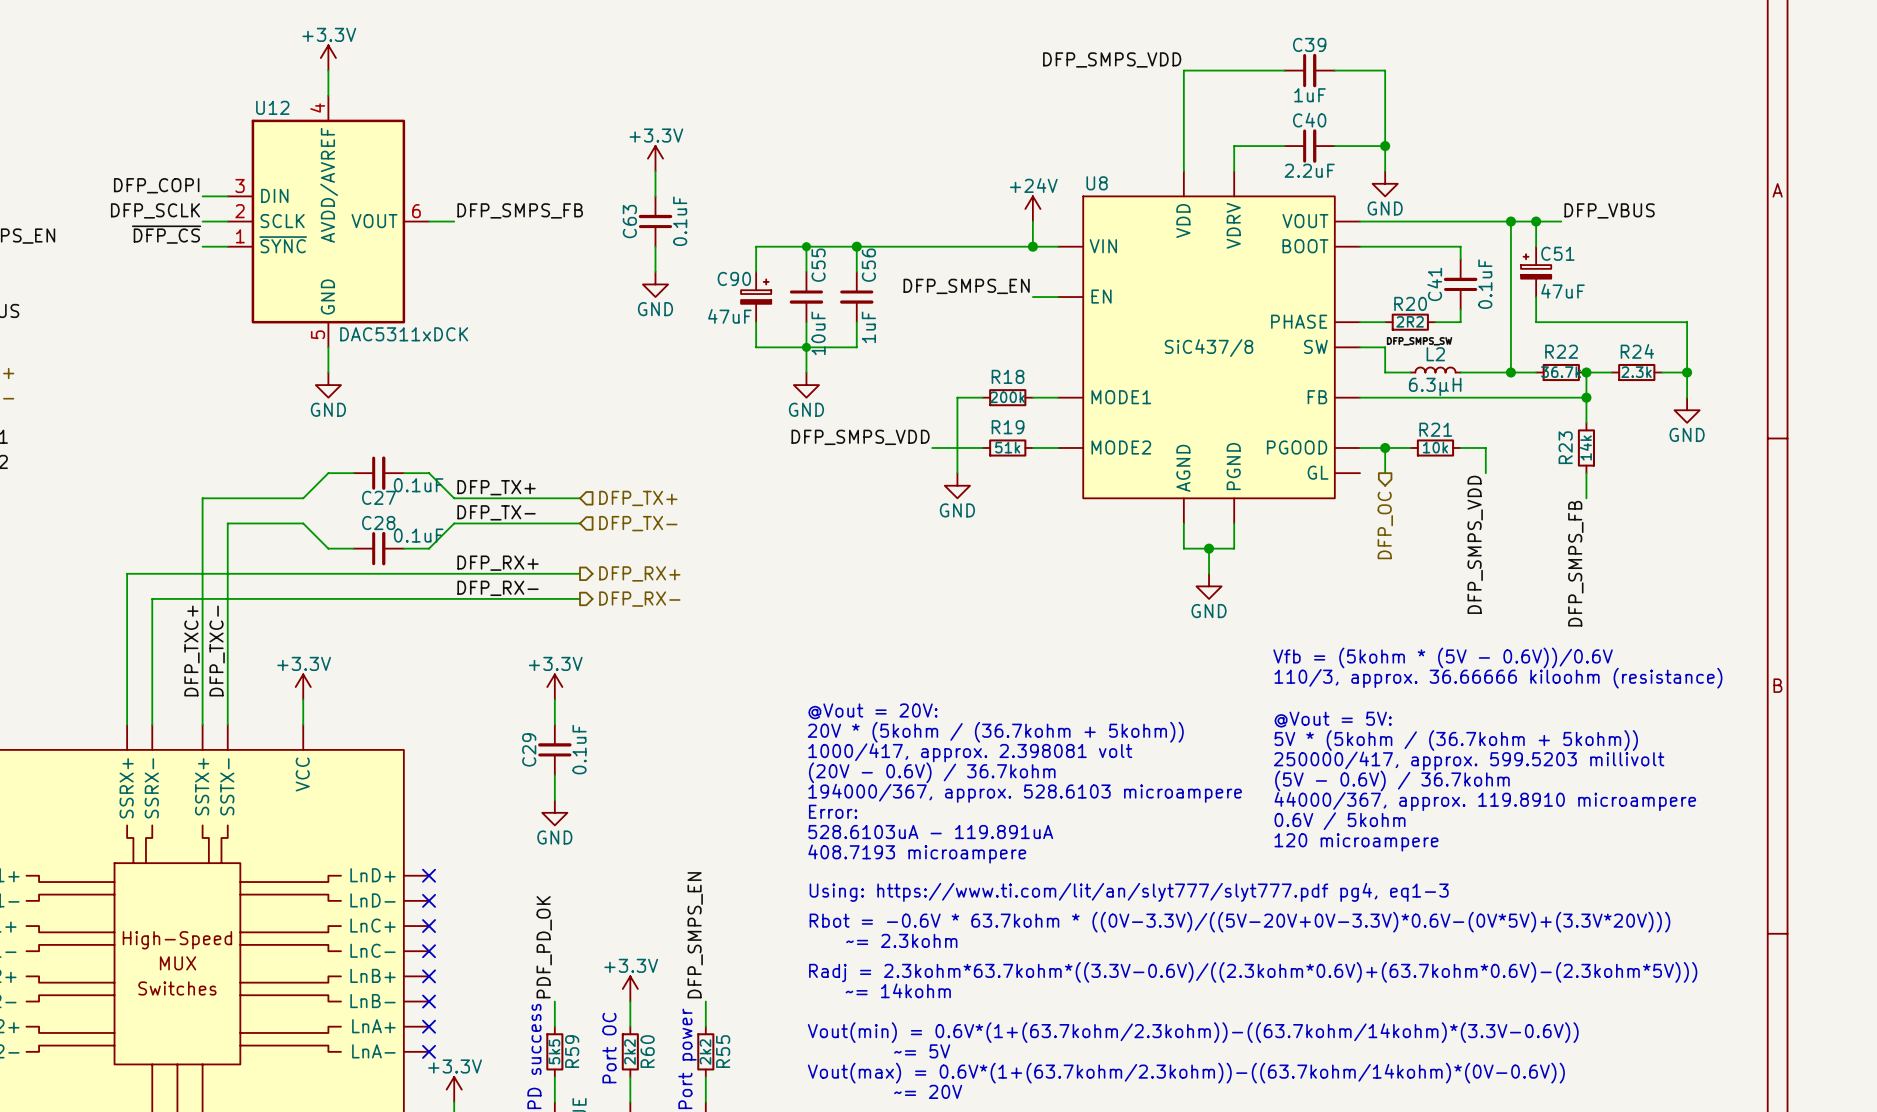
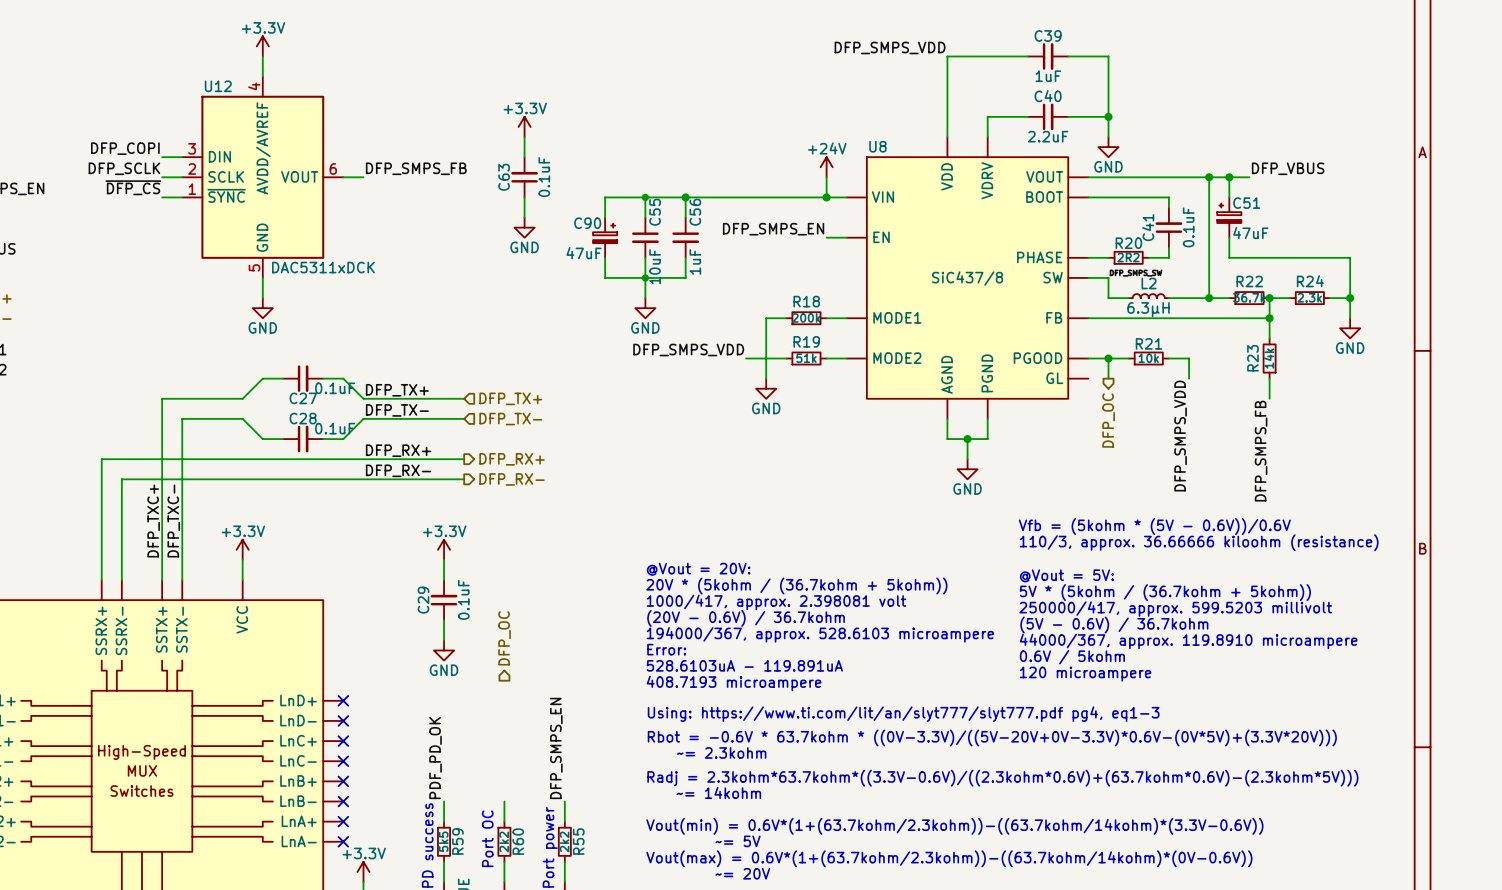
hierarchical label: none -> DFP_OC (504, 638)
power symbol: +3.3V (630, 988) -> none

